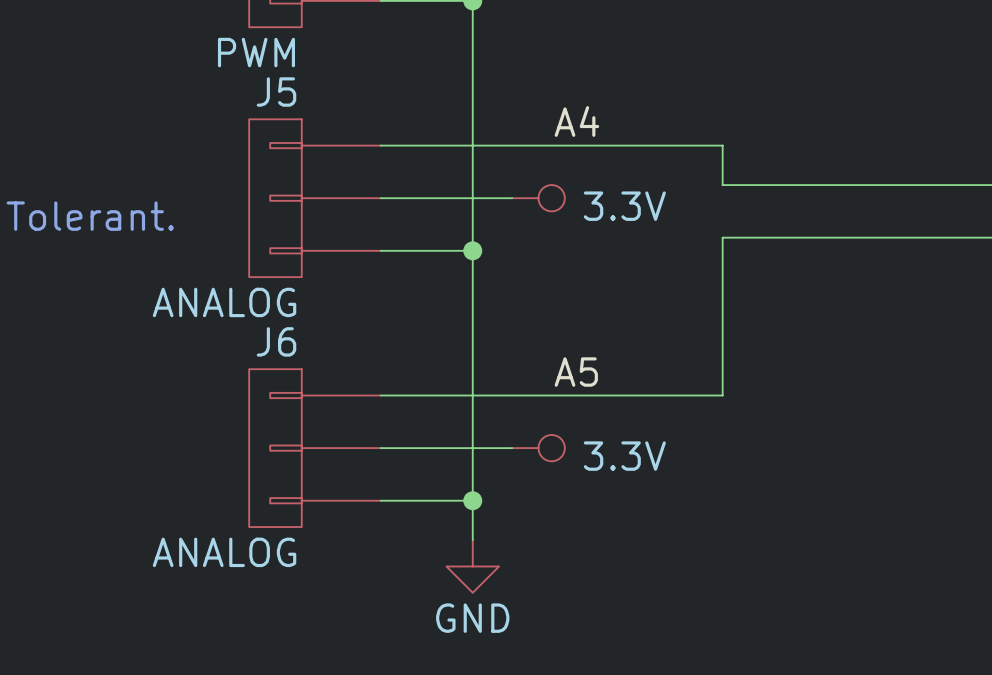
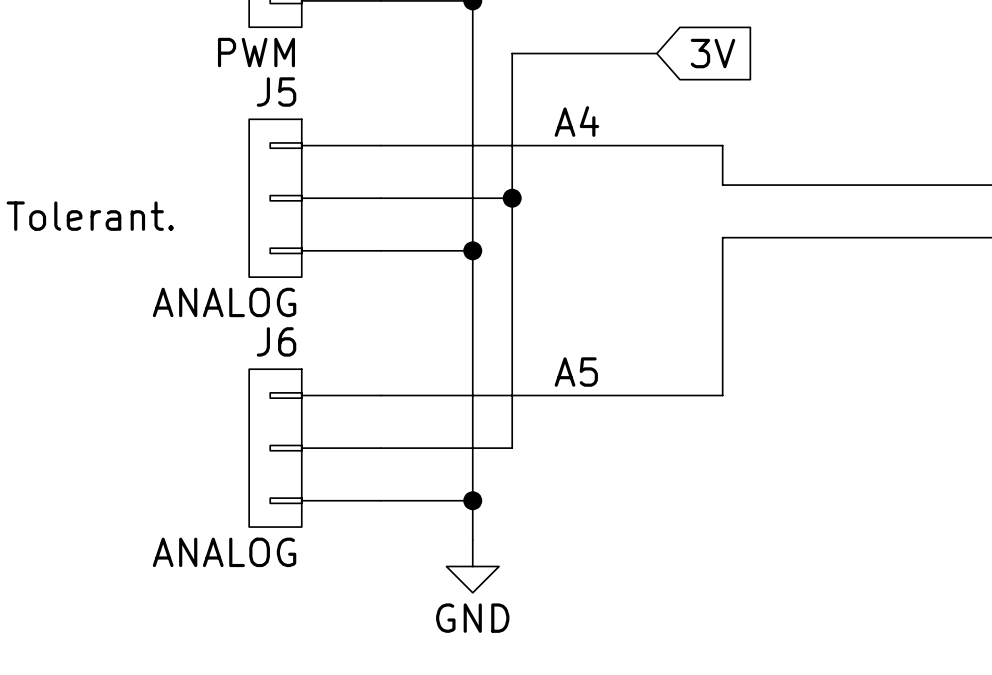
wire: none -> (656, 53) (512, 53) (512, 448)
global label: none -> 3V (712, 53)
junction: none -> (512, 198)
power symbol: 3.3V (538, 198) -> none
power symbol: 3.3V (538, 448) -> none

